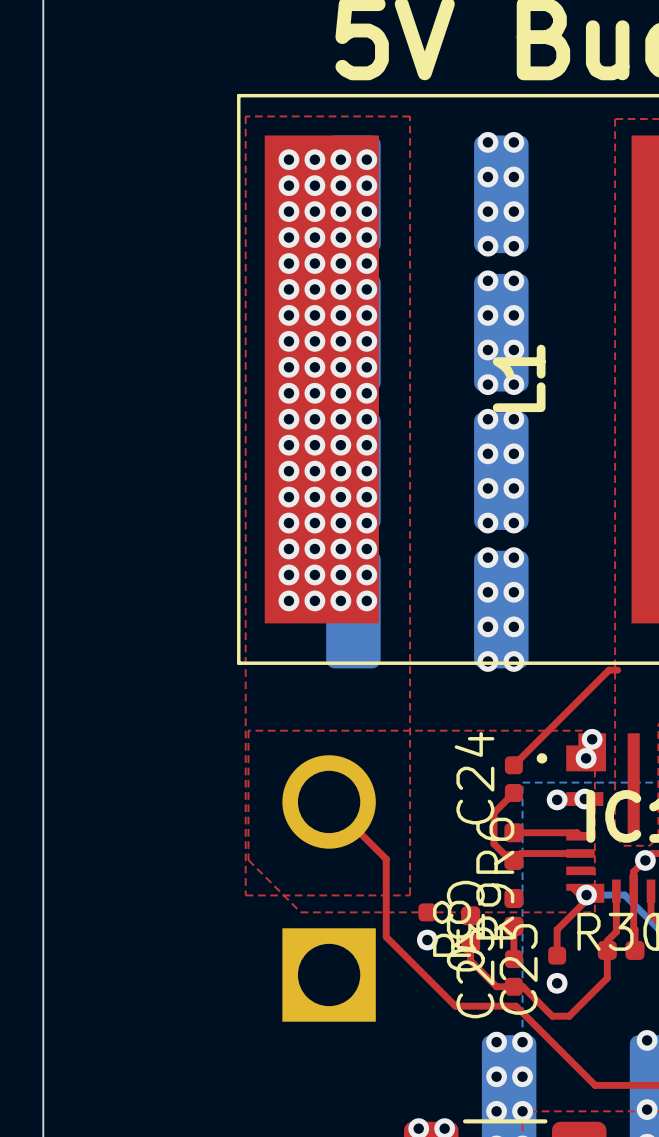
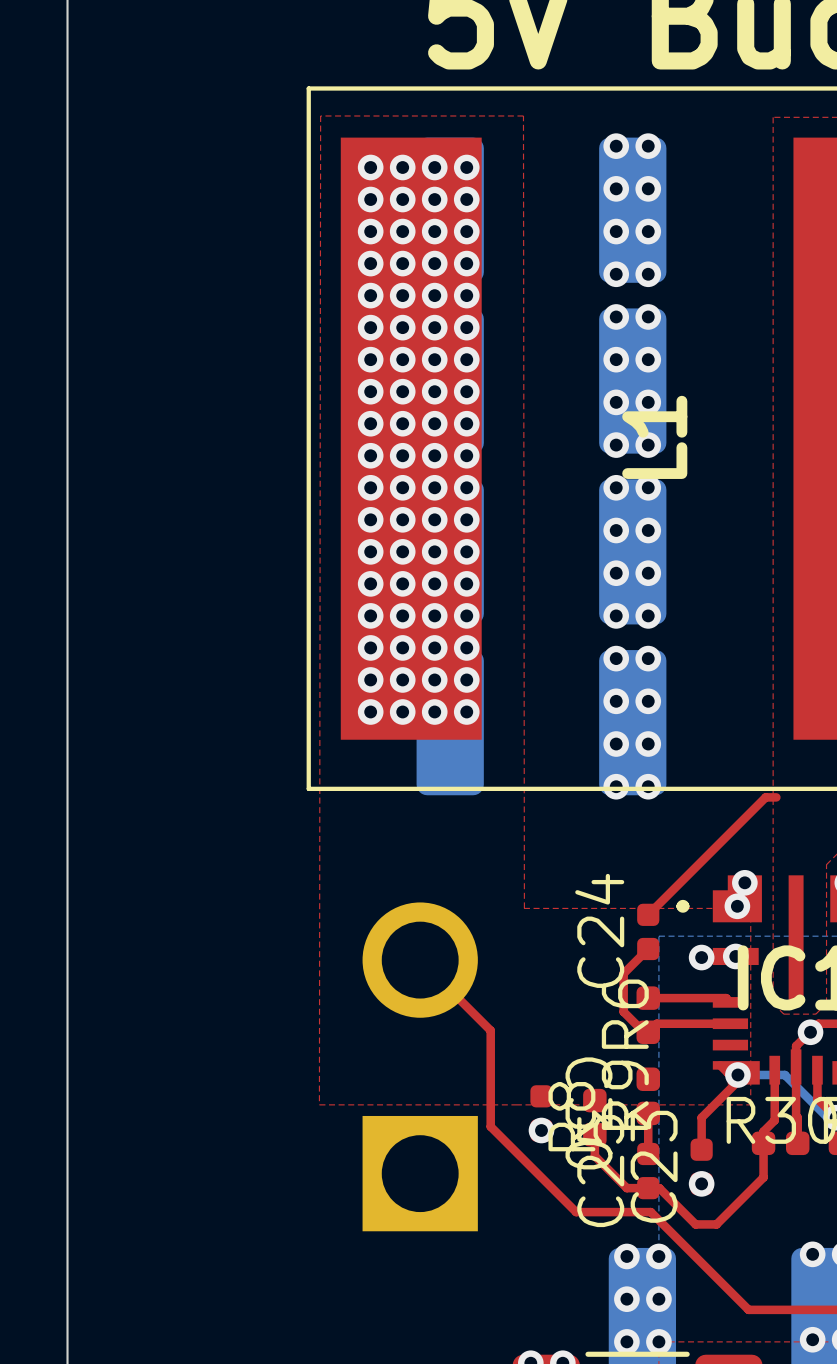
top zone outline: none -> (320, 115) (319, 1104) (750, 1104) (750, 908) (524, 908) (523, 115) (320, 115)
top zone outline: (248, 730) (594, 730) (594, 912) (300, 912) (248, 860) (248, 730) -> none
top zone outline: (410, 895) (410, 116) (245, 116) (245, 895) (409, 895) -> none

